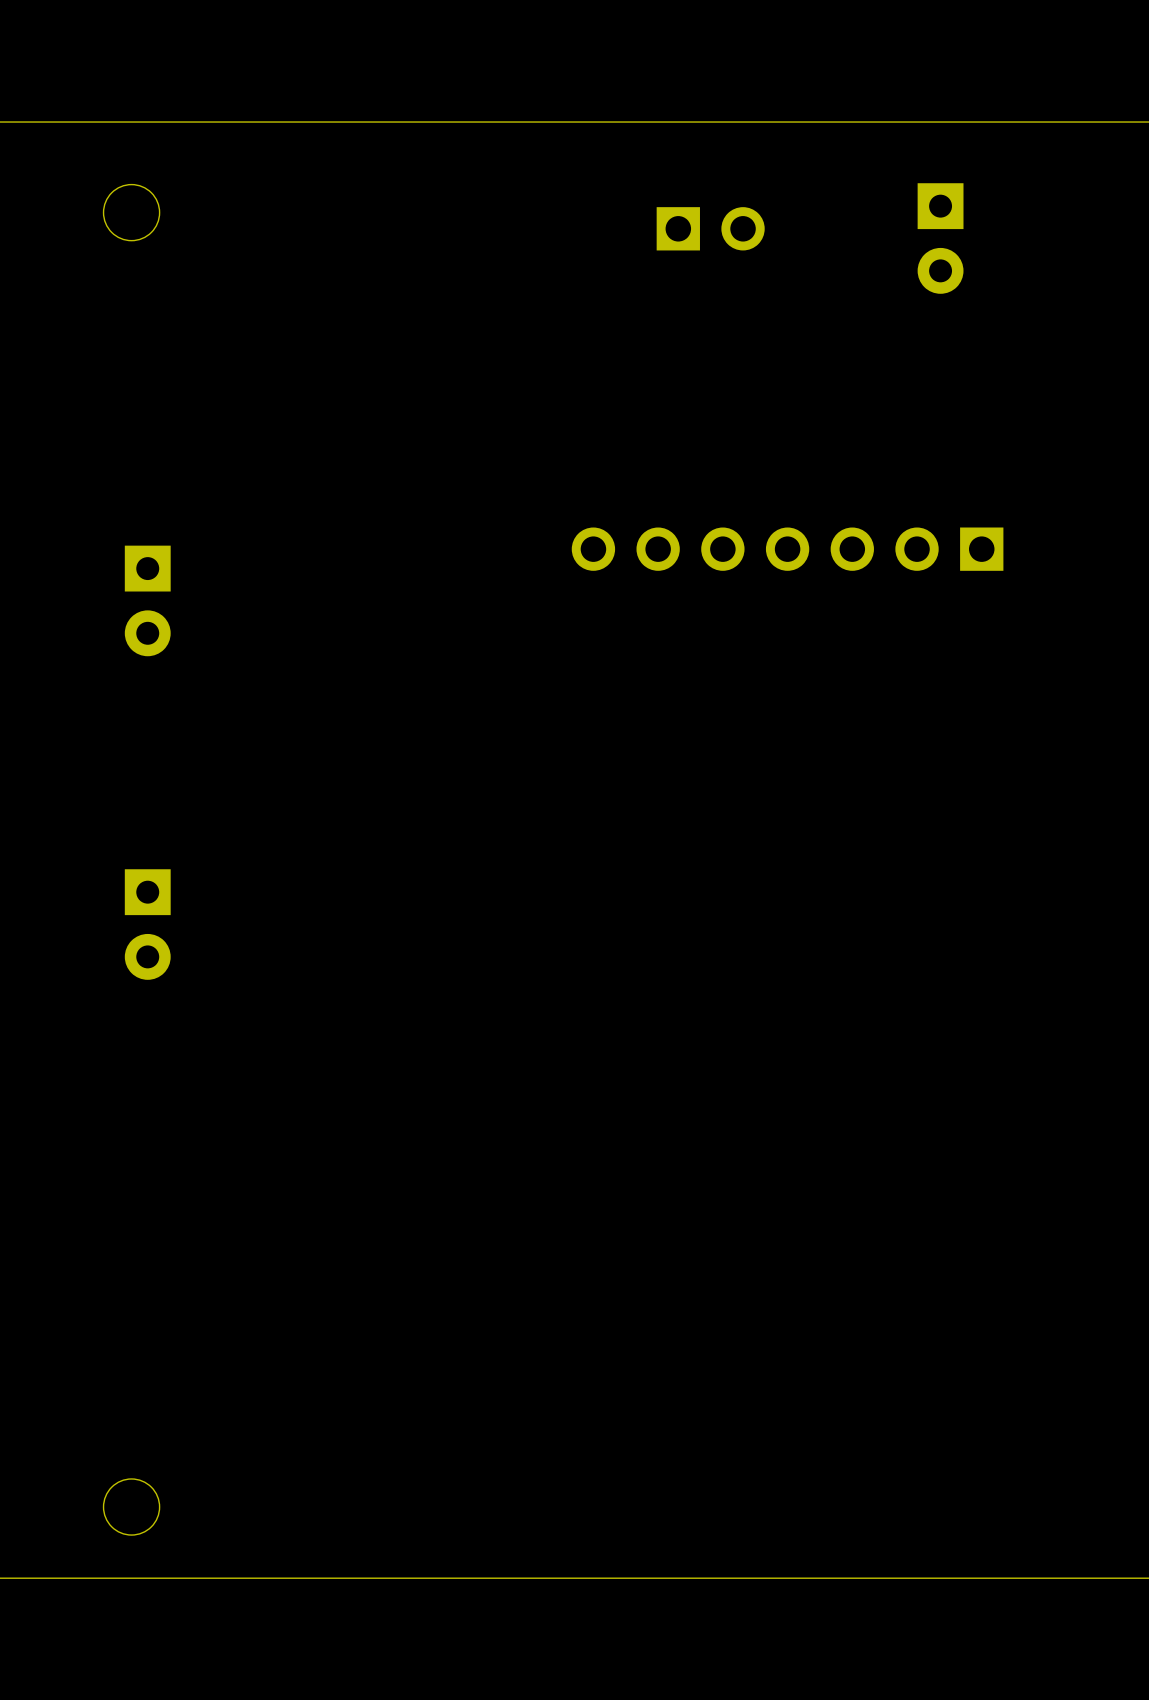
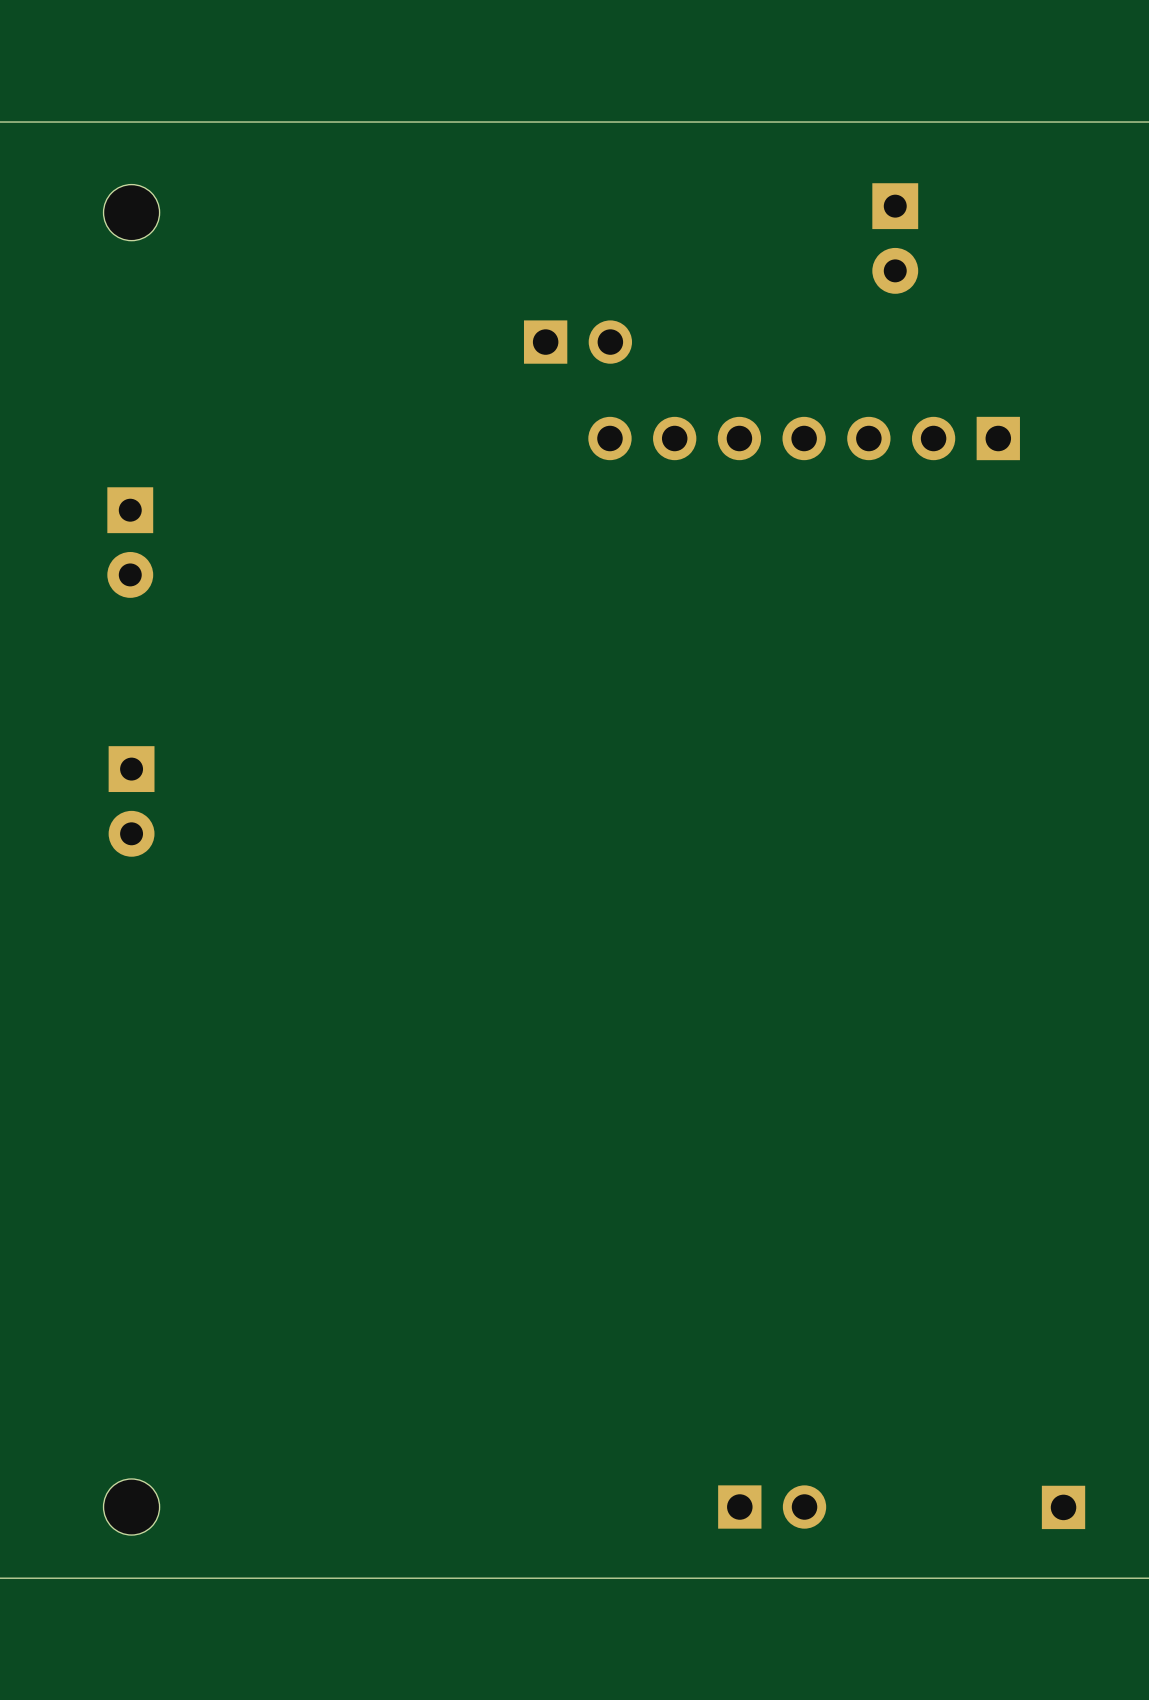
part position: (710, 228) -> (578, 342)
part position: (940, 238) -> (895, 238)
part position: (787, 549) -> (804, 438)
part position: (147, 600) -> (130, 542)
part: none -> (131, 801)
part: (147, 924) -> none
part: none -> (772, 1507)
part: none -> (1063, 1507)

